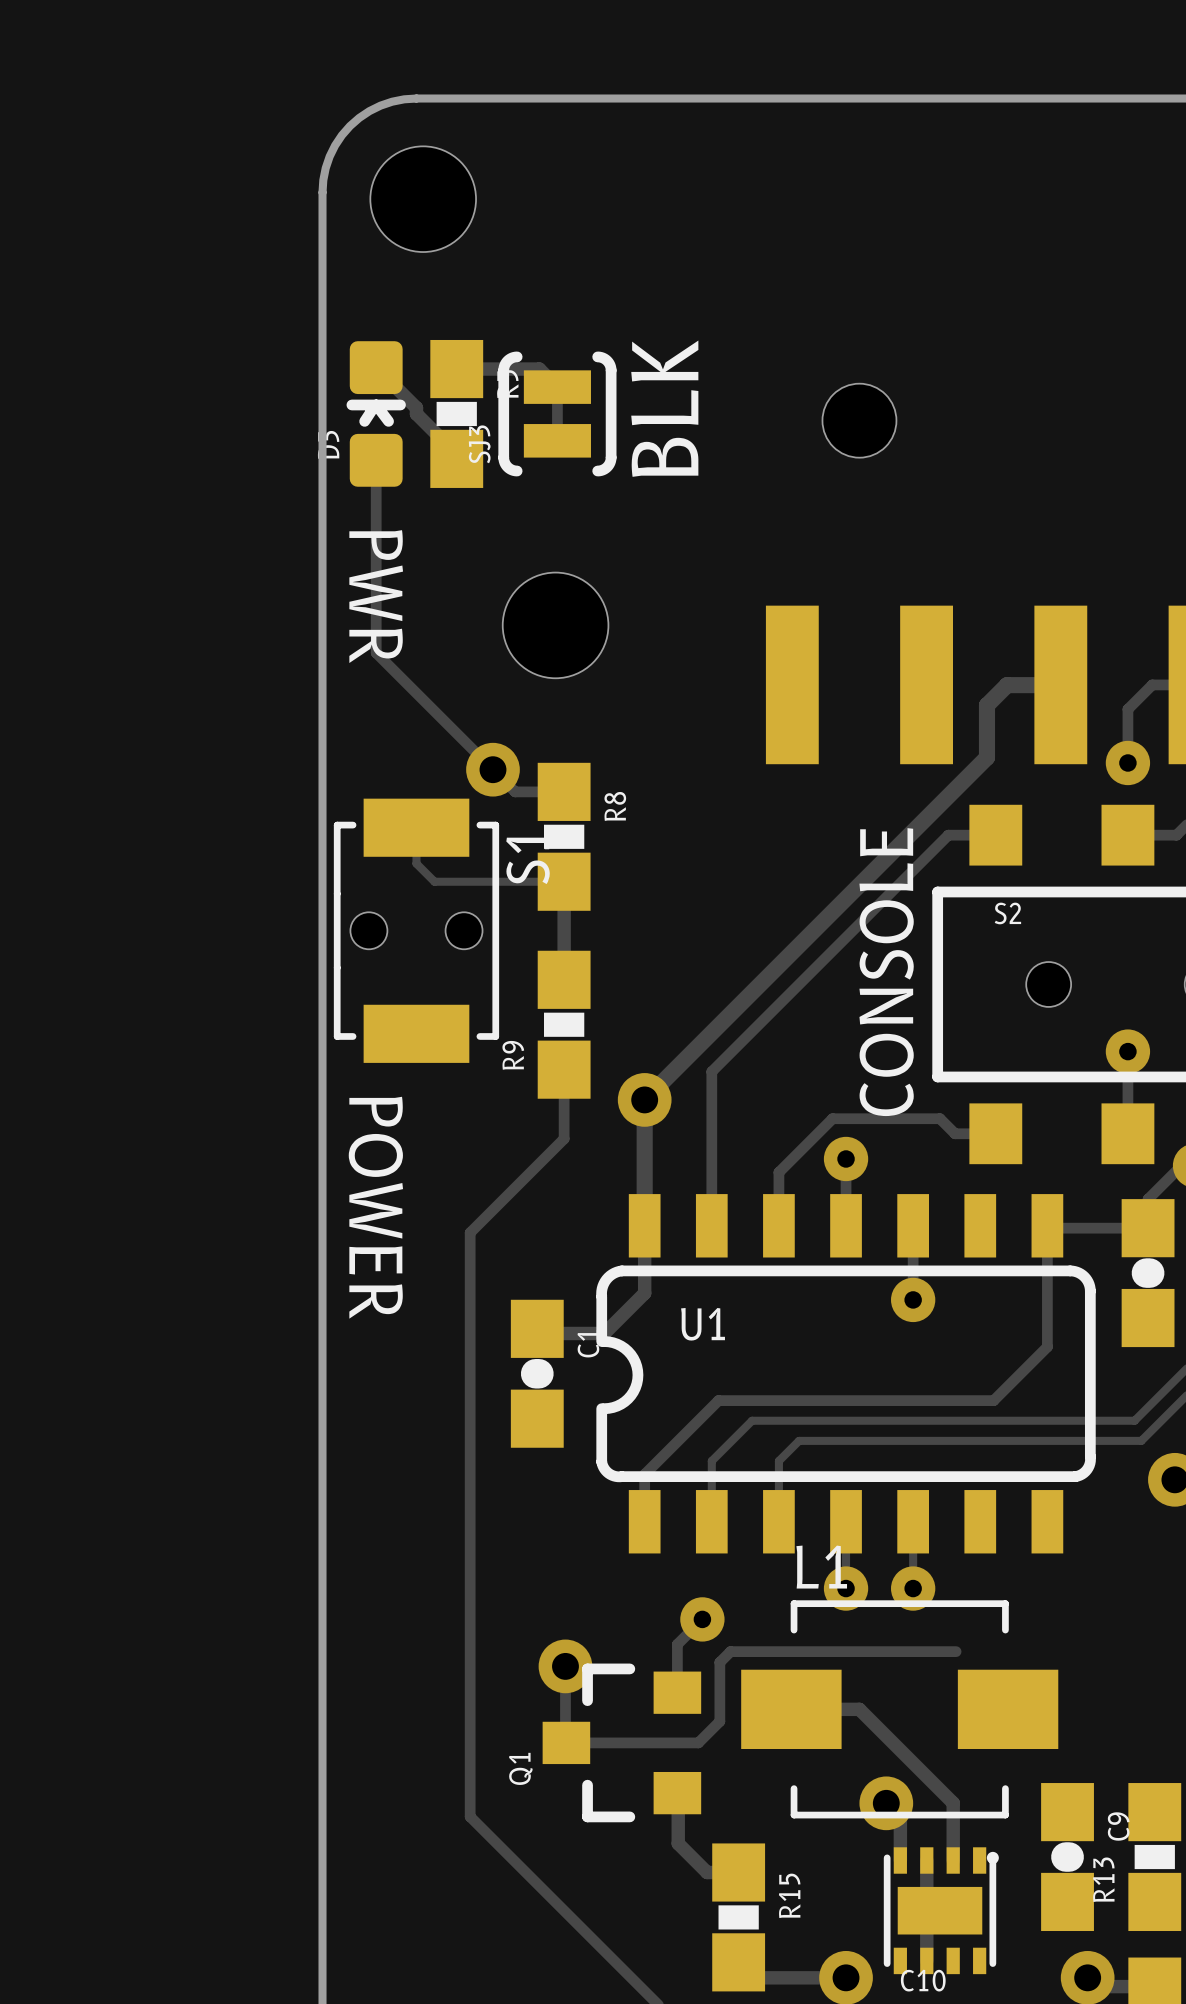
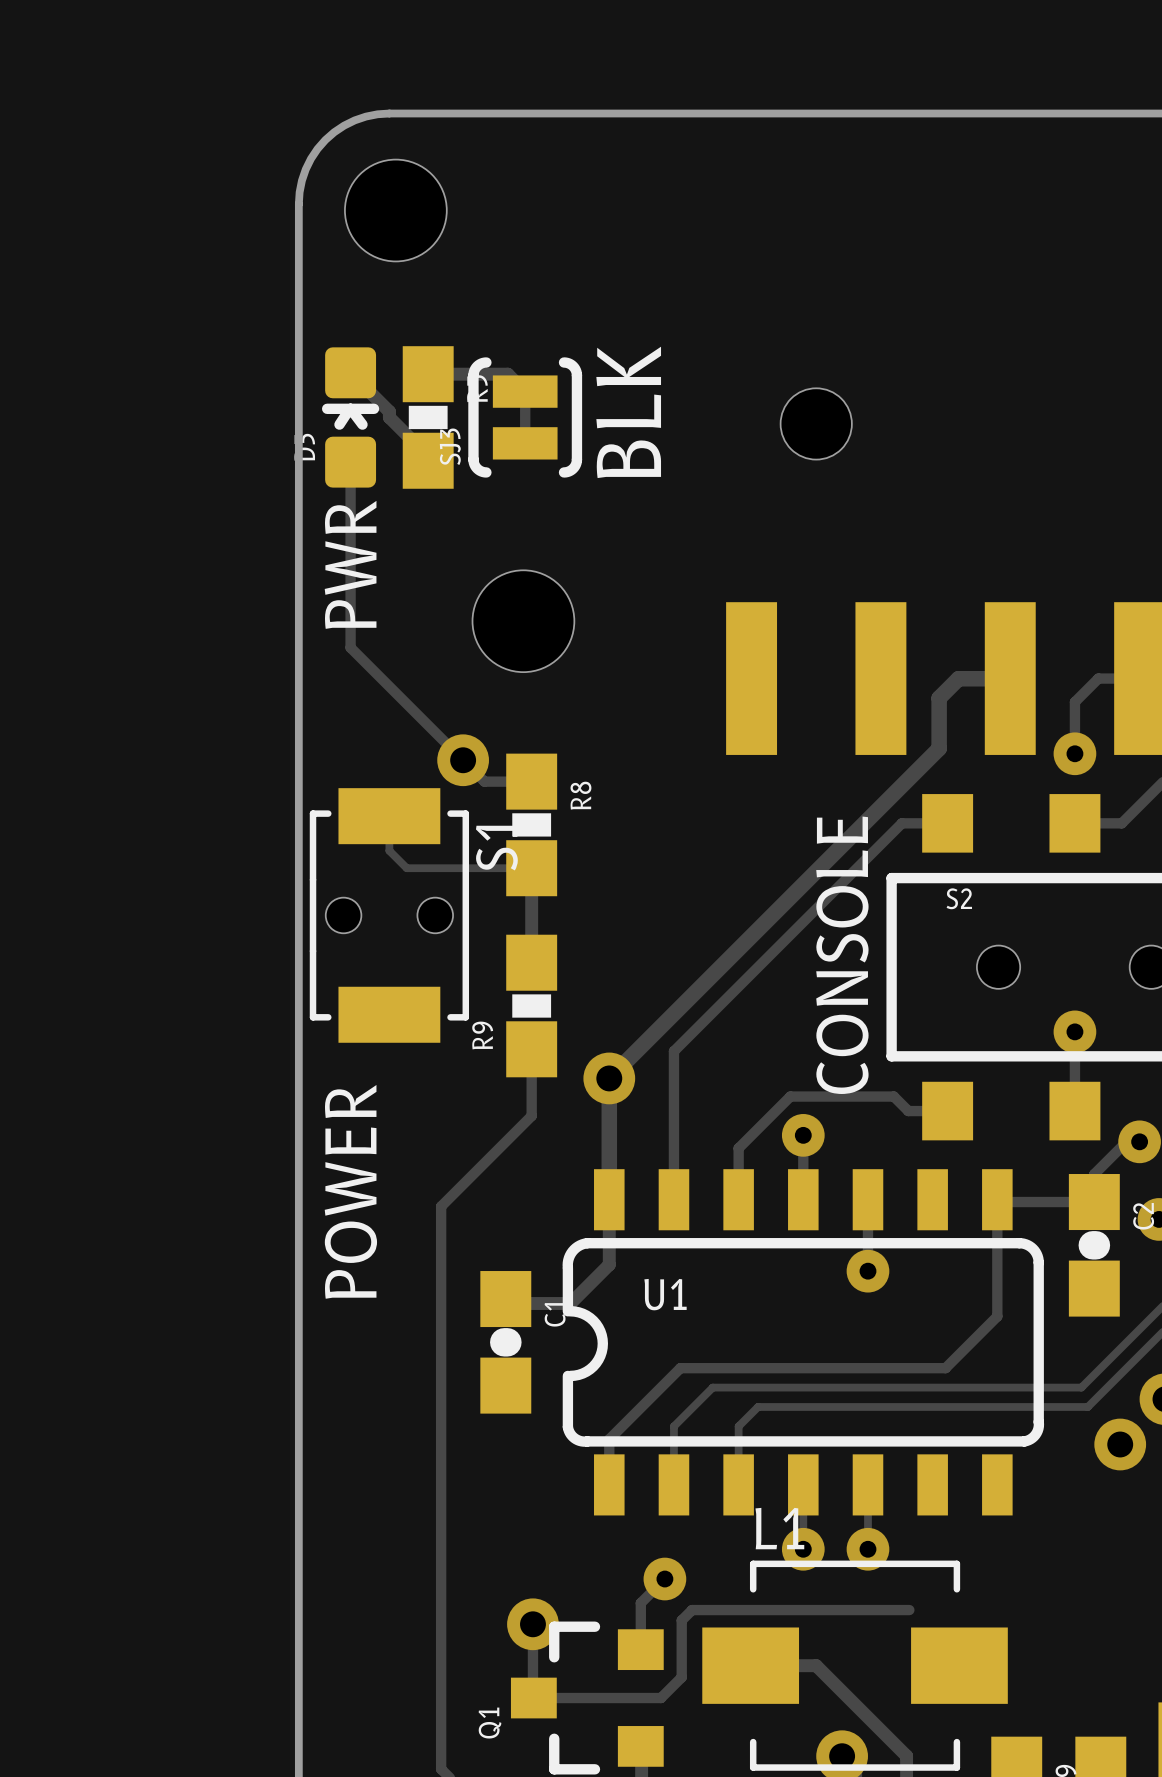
text rotation: 0° (376, 596) -> 180° (350, 564)
text rotation: 0° (375, 1207) -> 180° (350, 1191)

